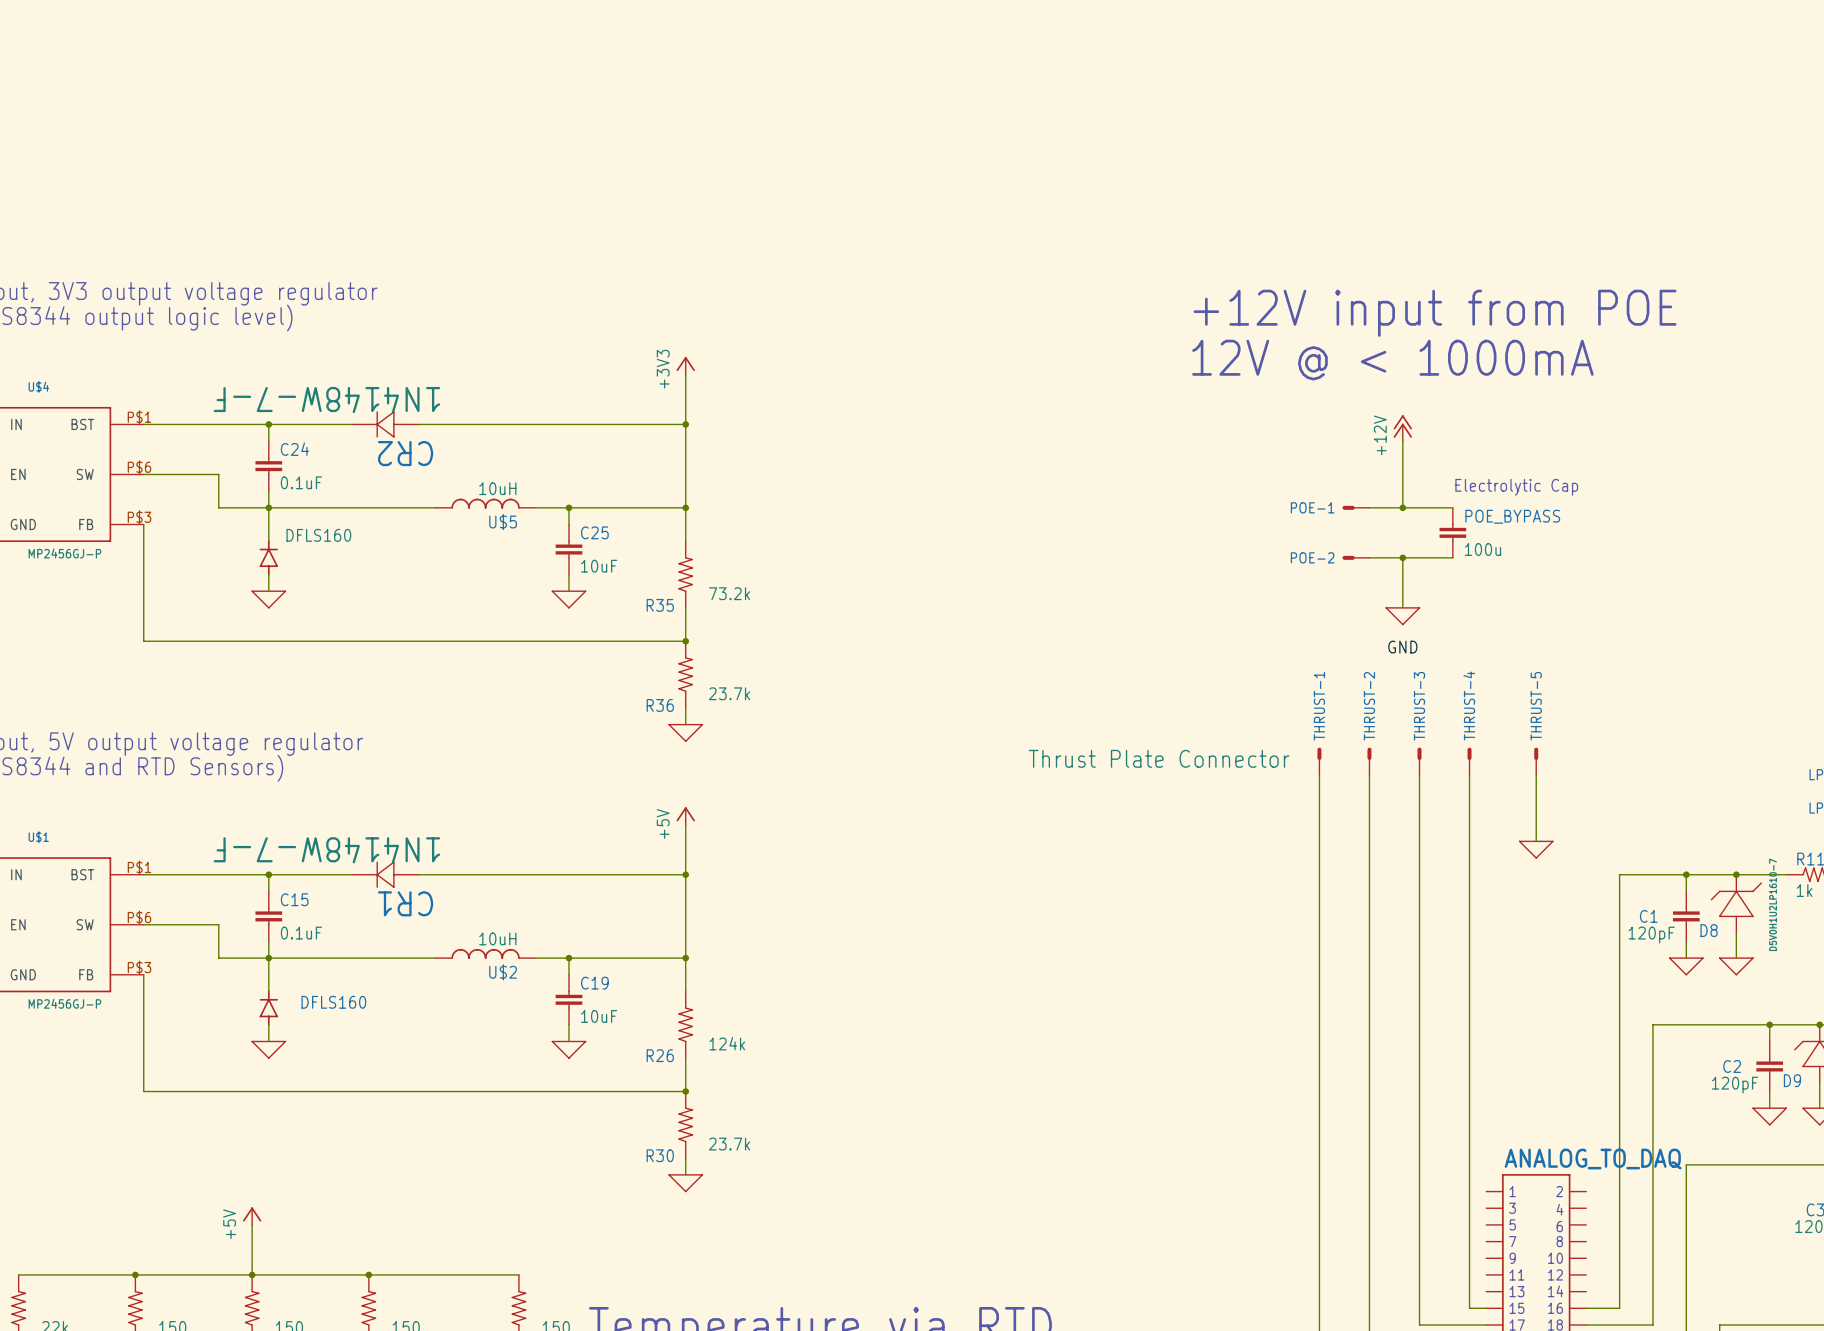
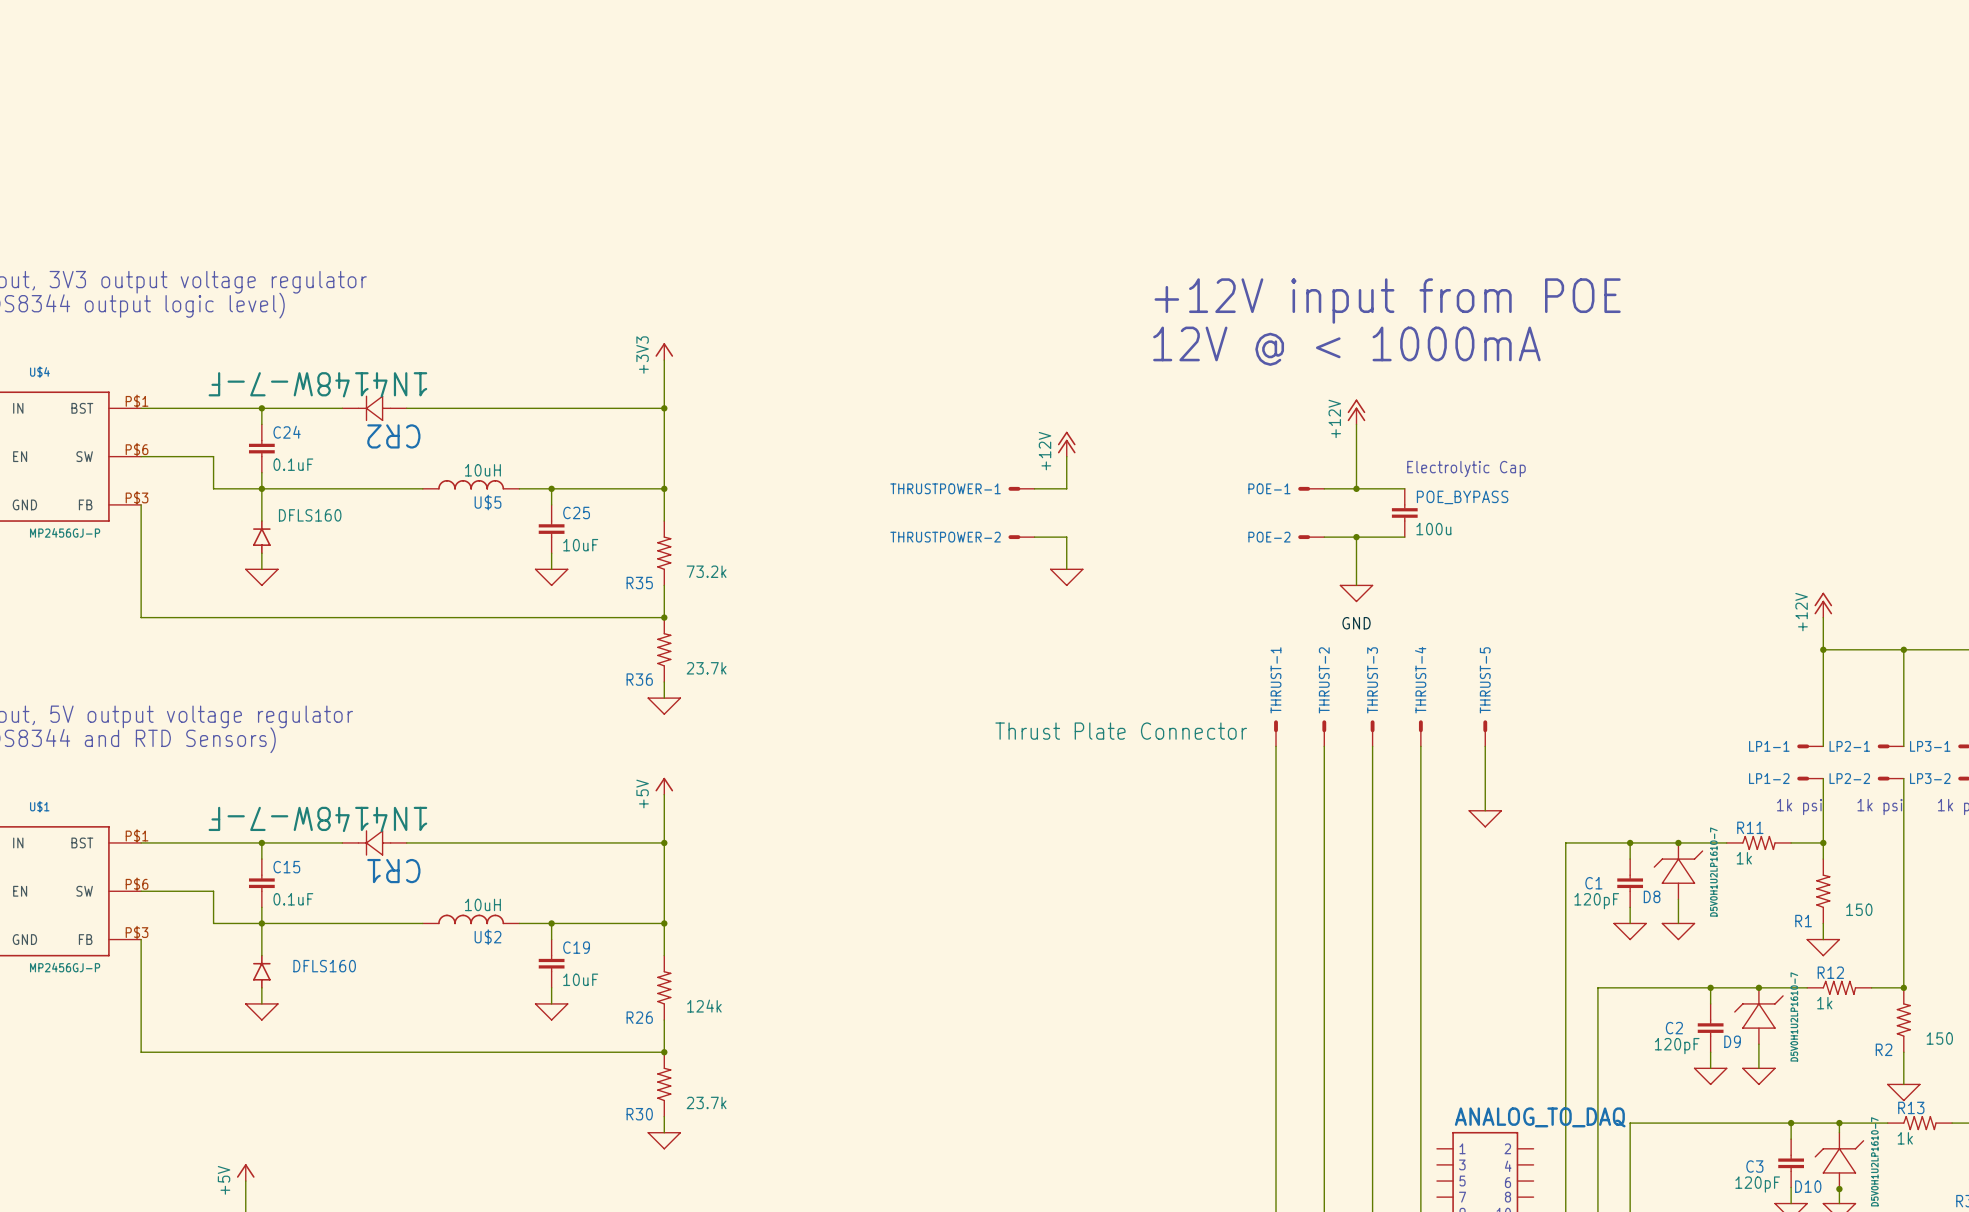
power symbol: none -> +12V (1066, 444)
wire: none -> (1066, 456) (1066, 488) (1034, 488)
THRUSTPOWER-1: none -> (1021, 488)
THRUSTPOWER-2: none -> (1021, 537)
wire: none -> (1034, 537) (1066, 537) (1066, 569)
power symbol: none -> (1066, 577)

